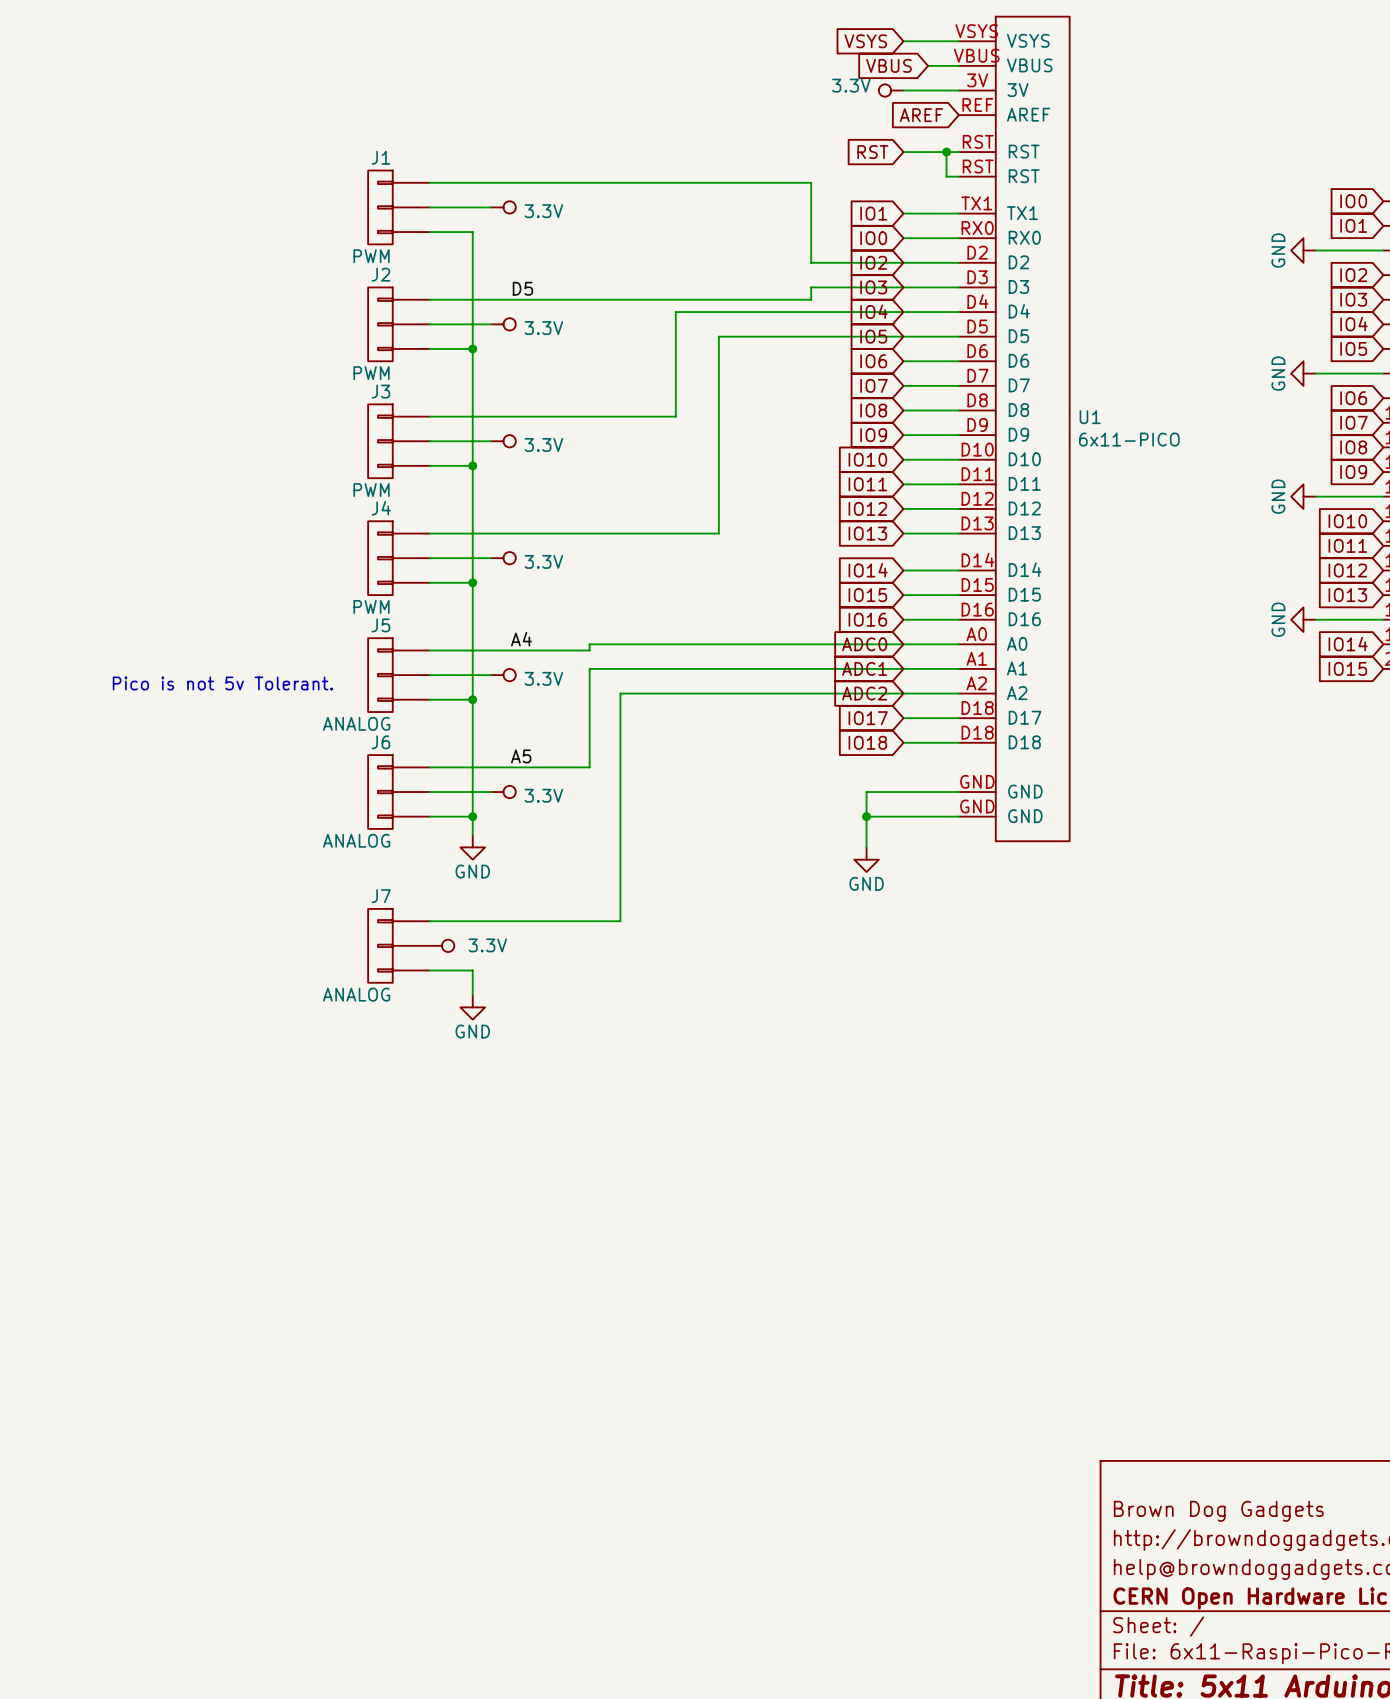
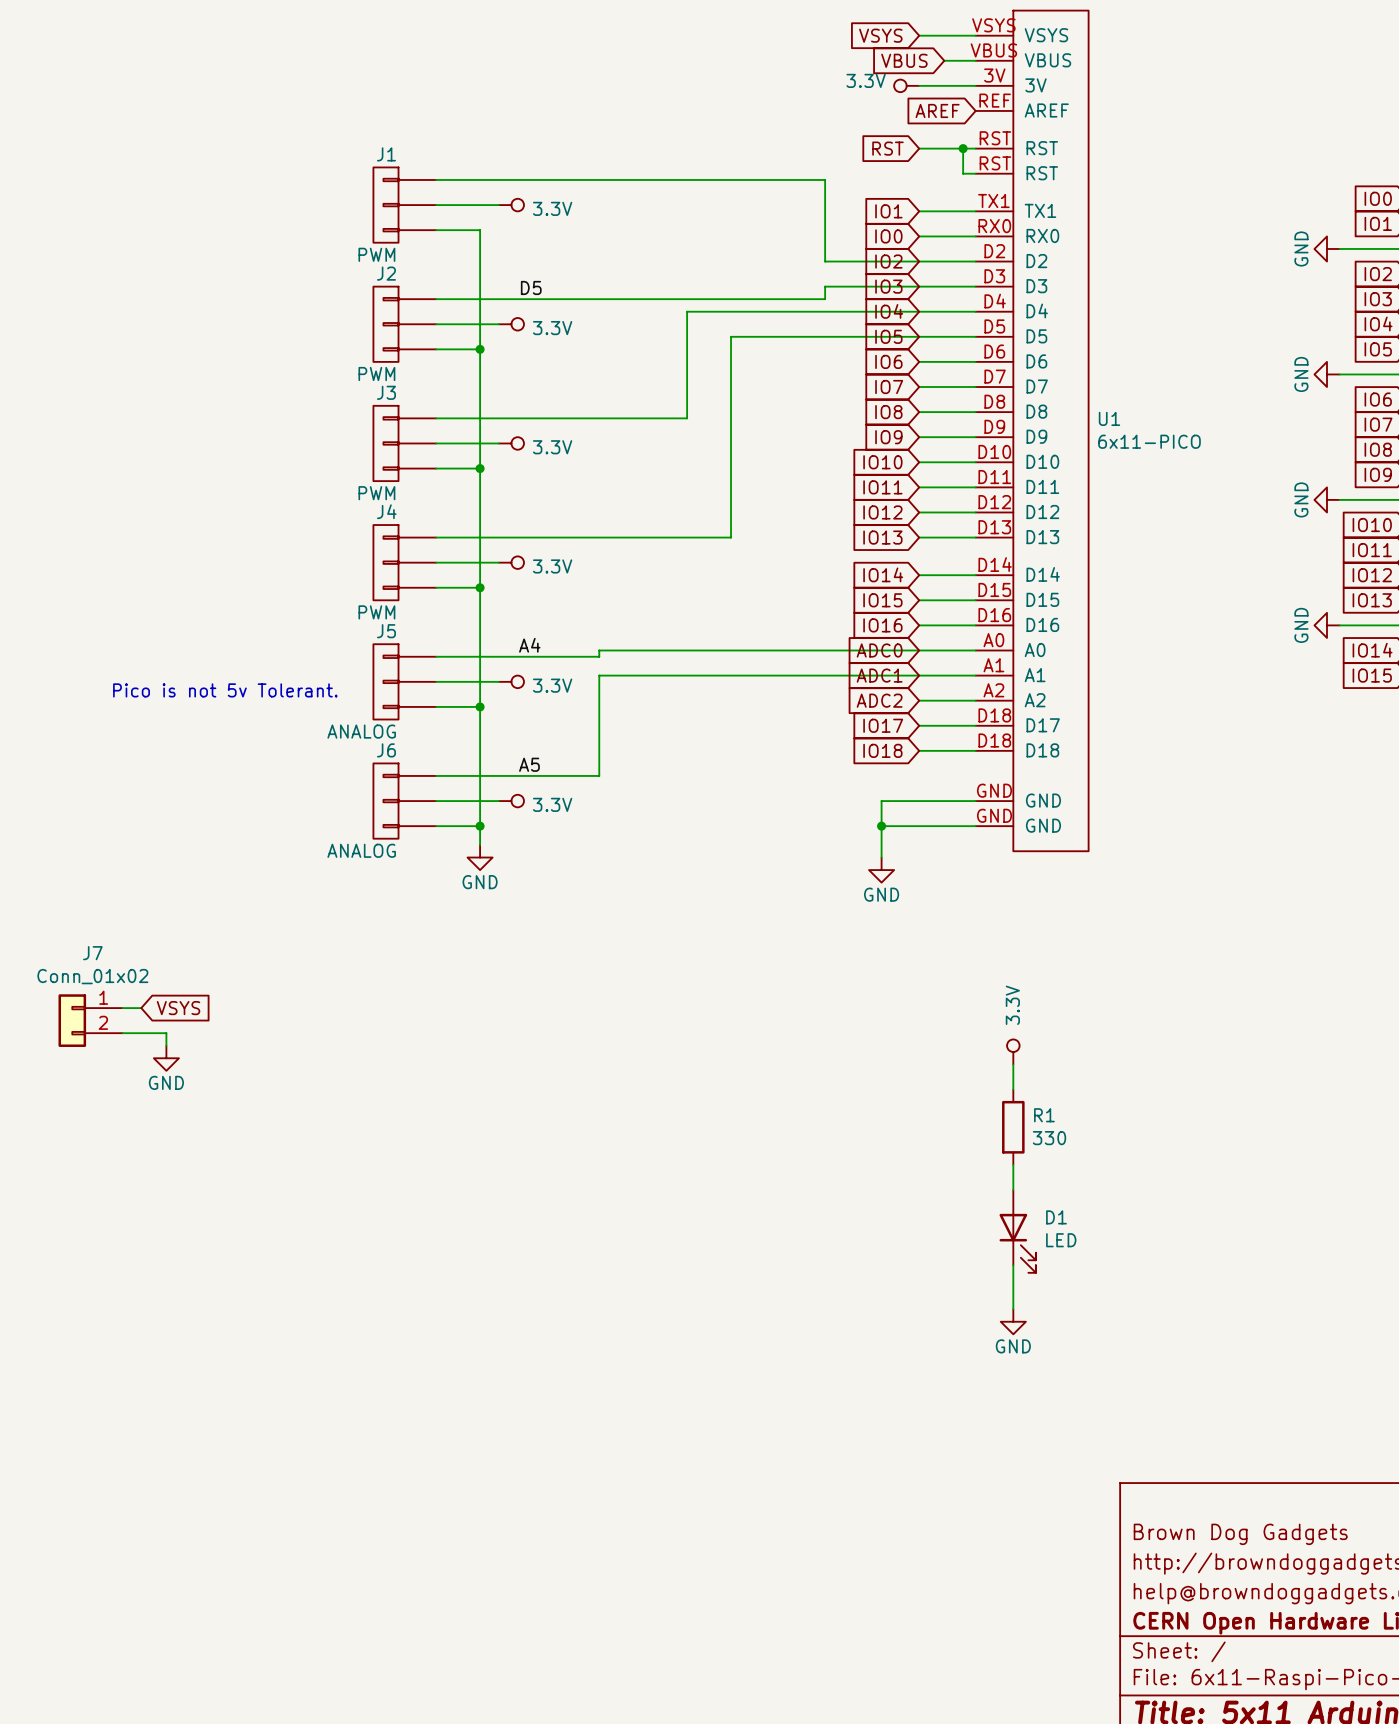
wire: (903, 693) (620, 693) (620, 921) (429, 921) -> none
J7 name position: J7 (381, 896) -> J7 (92, 953)
J7 symbol: [368, 908, 430, 983] -> [58, 994, 123, 1047]
power symbol: 3.3V (441, 945) -> none
wire: (429, 970) (472, 970) (472, 995) -> none
J7 value: ANALOG (356, 994) -> Conn_01x02 (92, 976)
wire: none -> (122, 1008) (141, 1008)
global label: none -> VSYS (178, 1008)
power symbol: GND (472, 1007) -> none
wire: none -> (122, 1033) (166, 1033) (166, 1045)
power symbol: none -> 3.3V (1013, 1052)
power symbol: none -> GND (166, 1058)
wire: none -> (1013, 1064) (1013, 1089)
R1: none -> 330 (1013, 1127)
wire: none -> (1013, 1164) (1013, 1190)
D1: none -> LED (1017, 1231)
wire: none -> (1013, 1265) (1013, 1309)
power symbol: none -> GND (1013, 1321)

